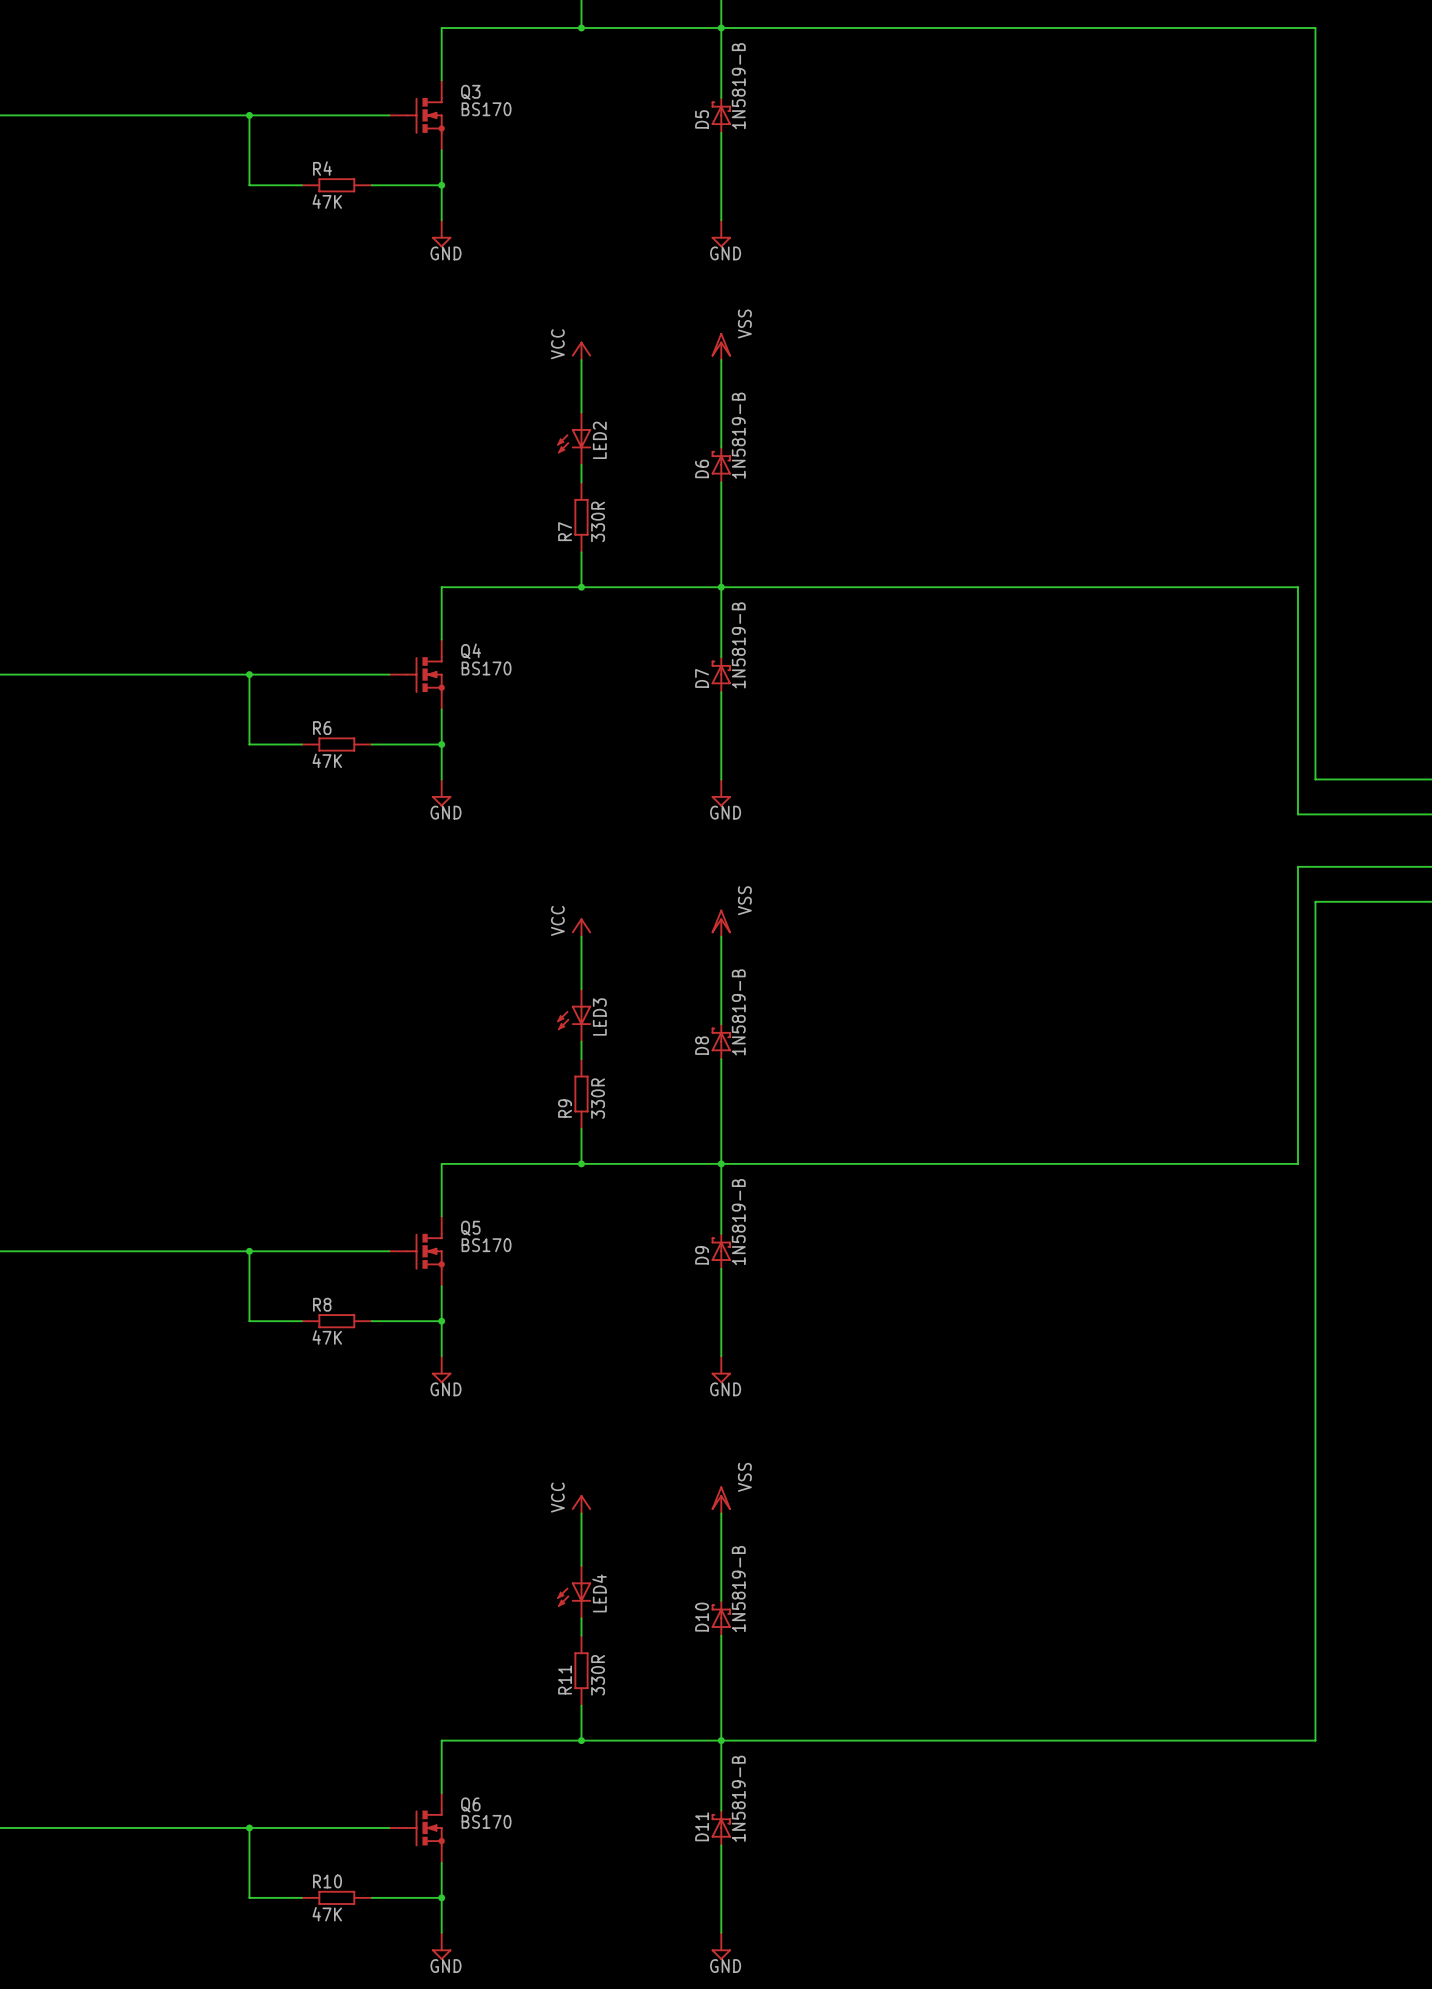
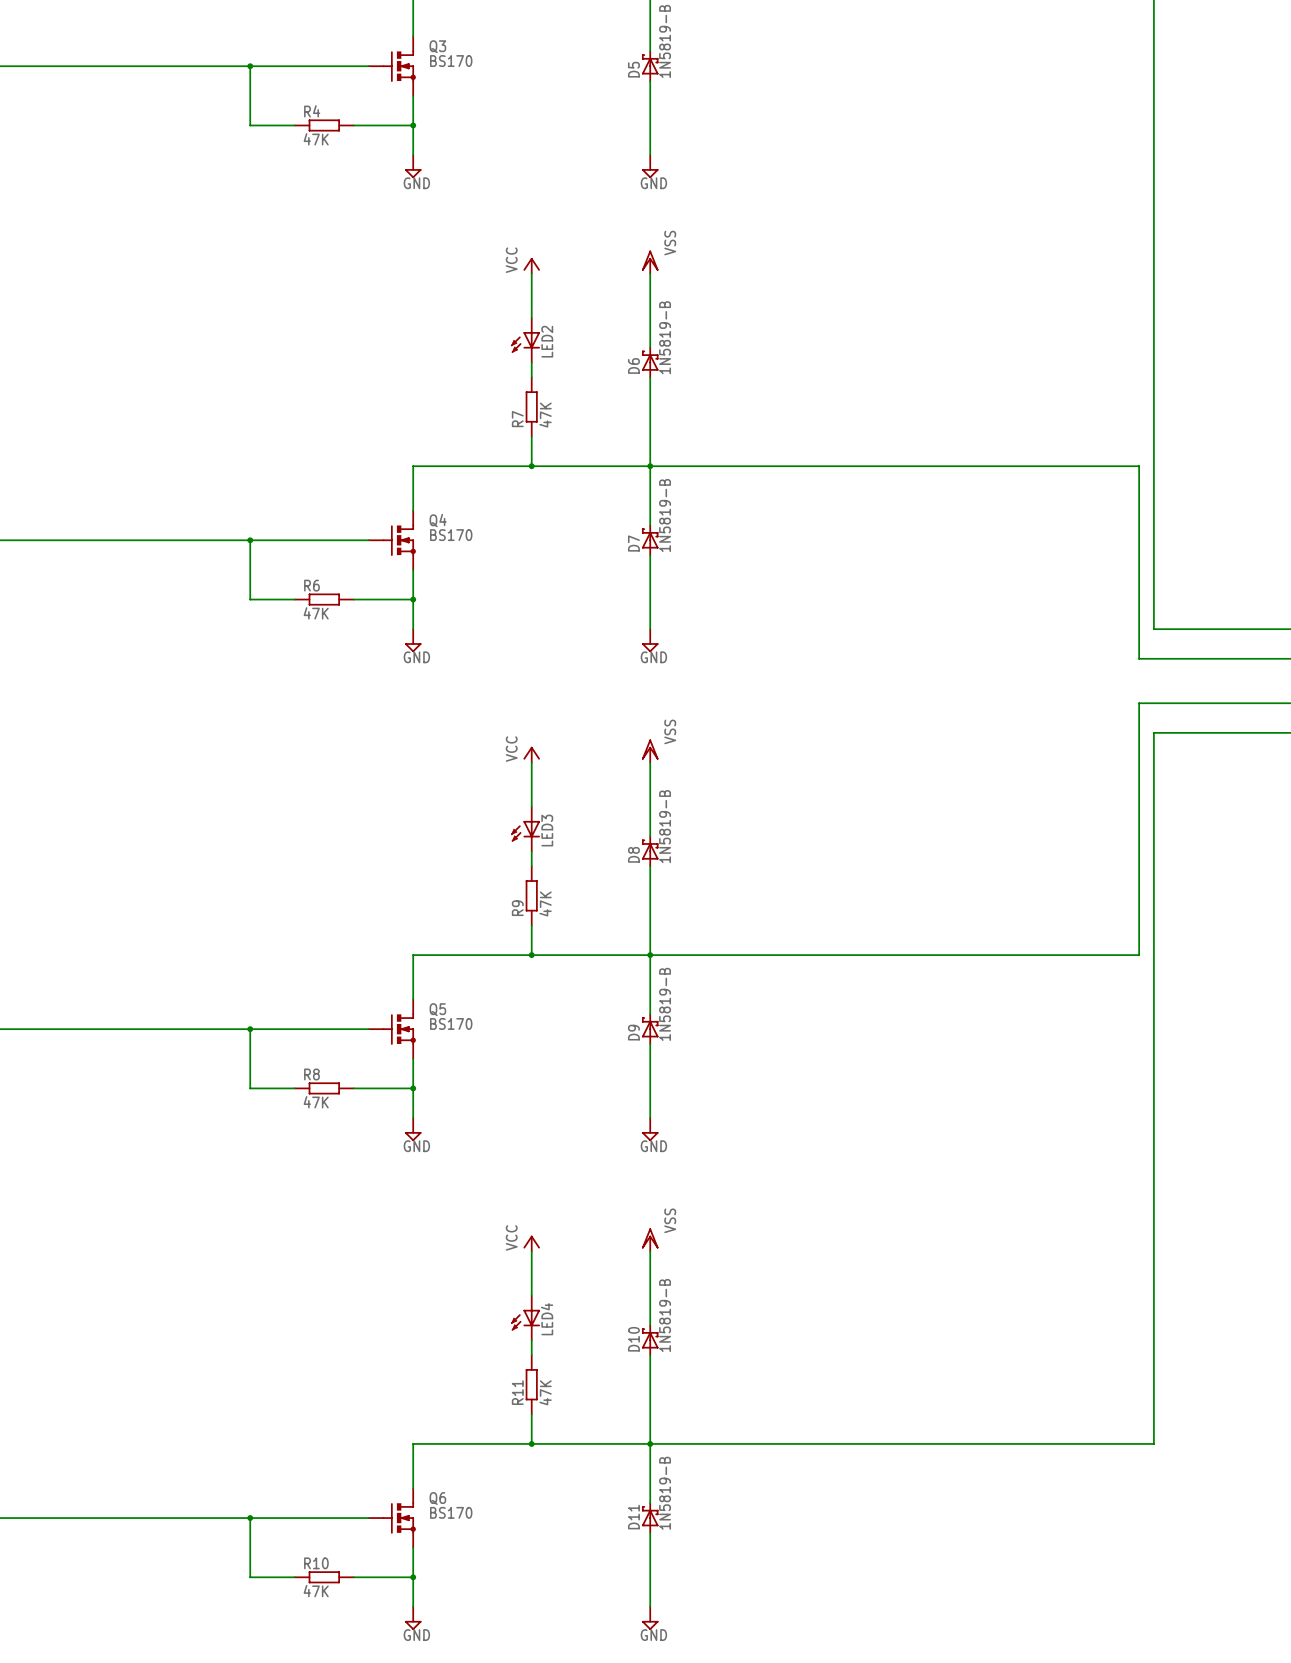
R7 value: 330R (598, 521) -> 47K (545, 415)
R9 value: 330R (598, 1098) -> 47K (545, 903)
R11 value: 330R (598, 1675) -> 47K (545, 1392)

